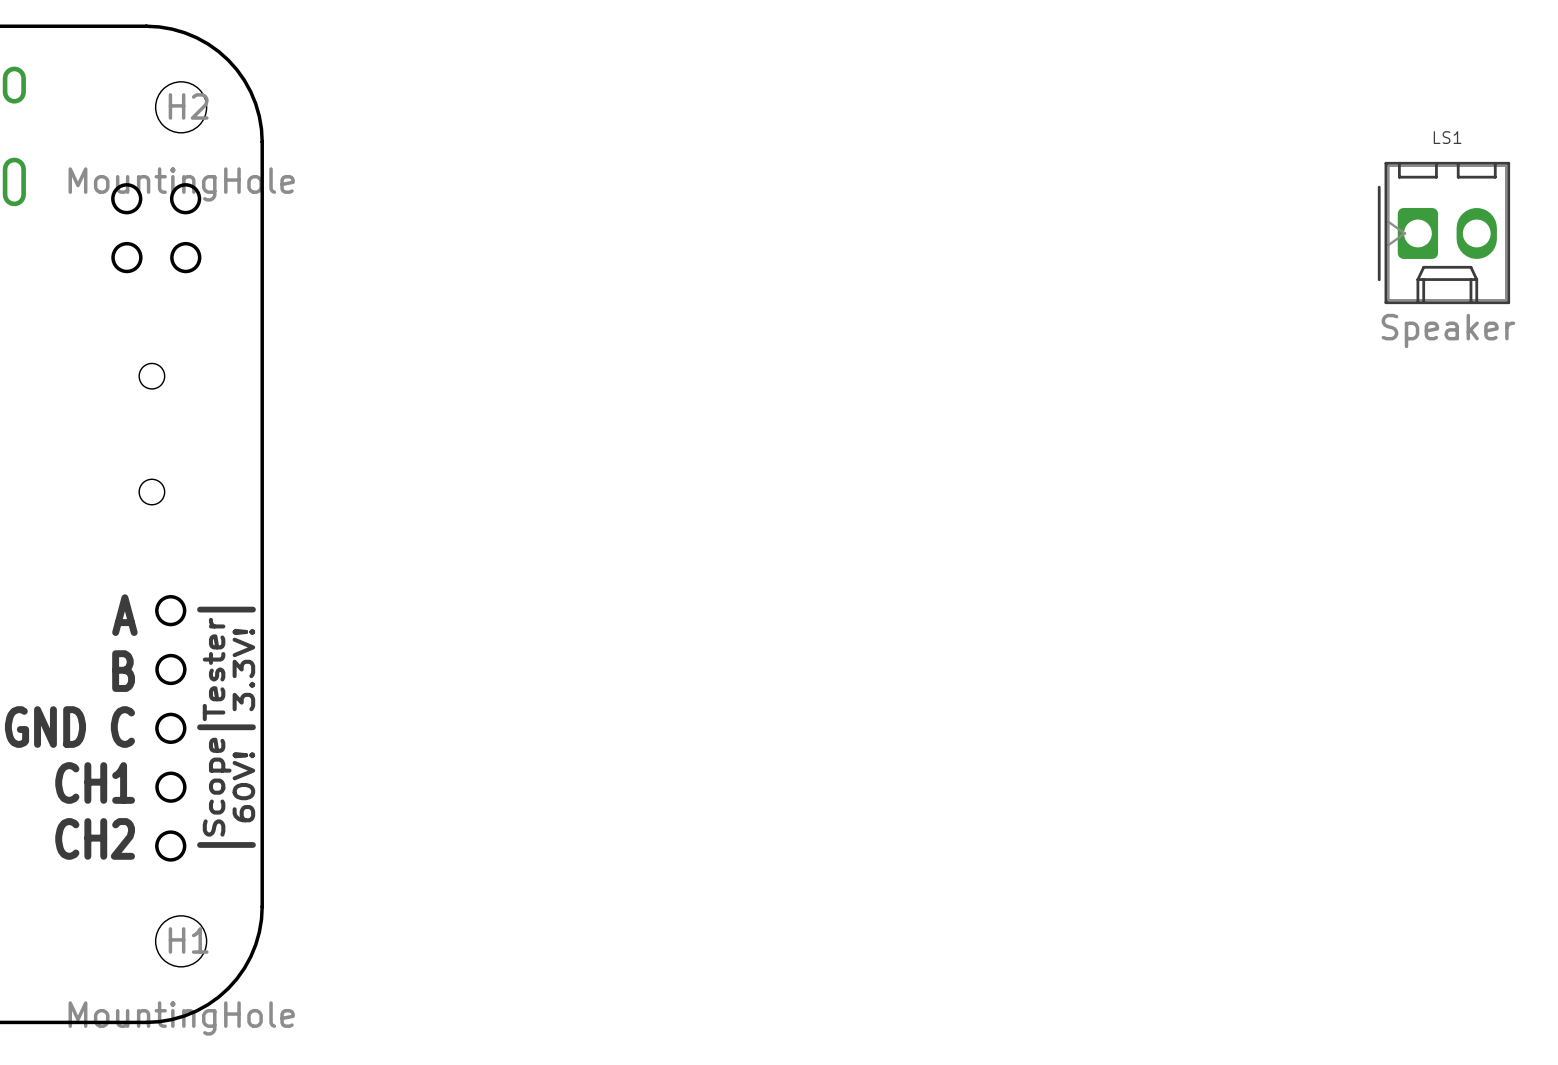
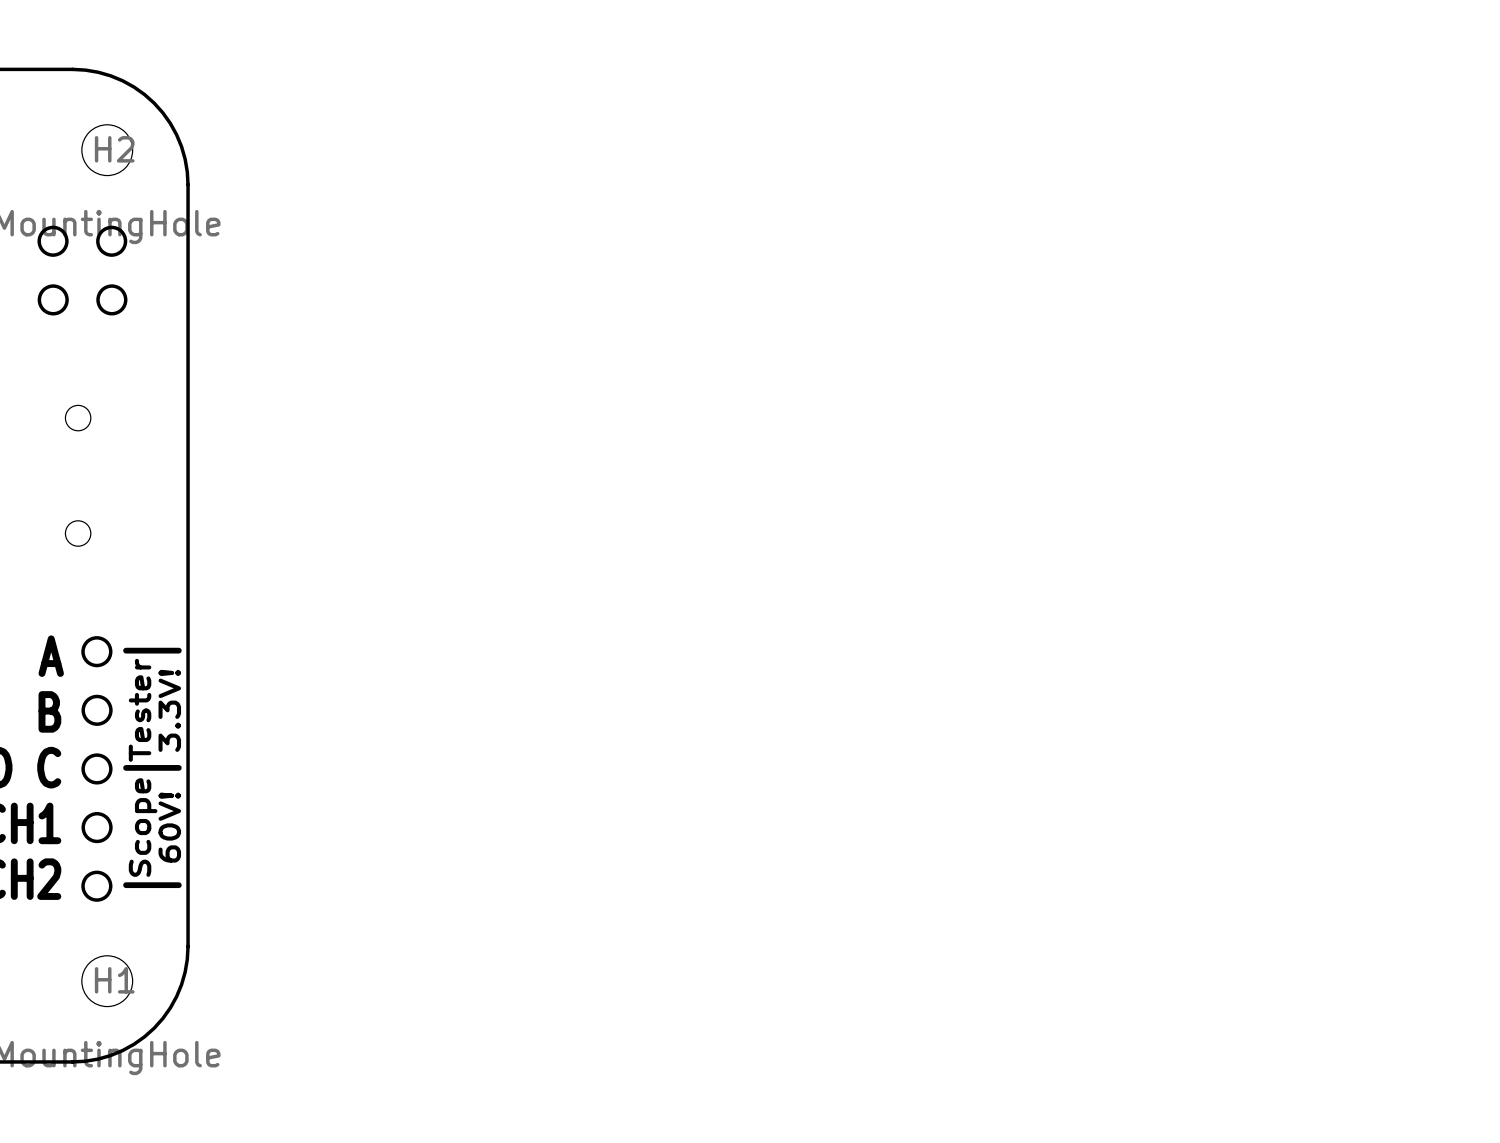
LS1: Speaker (1443, 233) -> none

